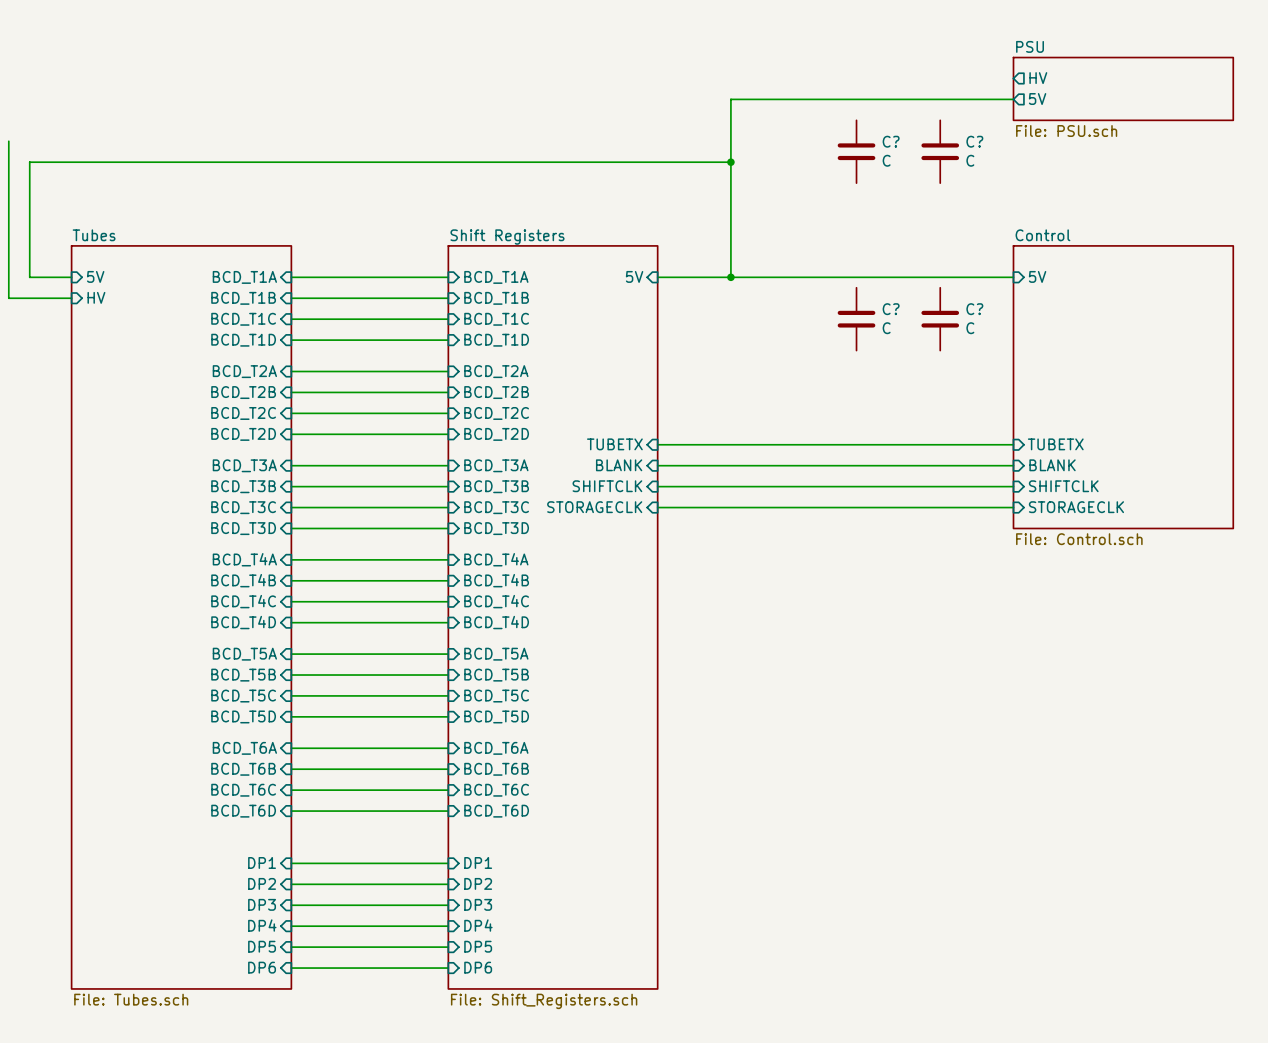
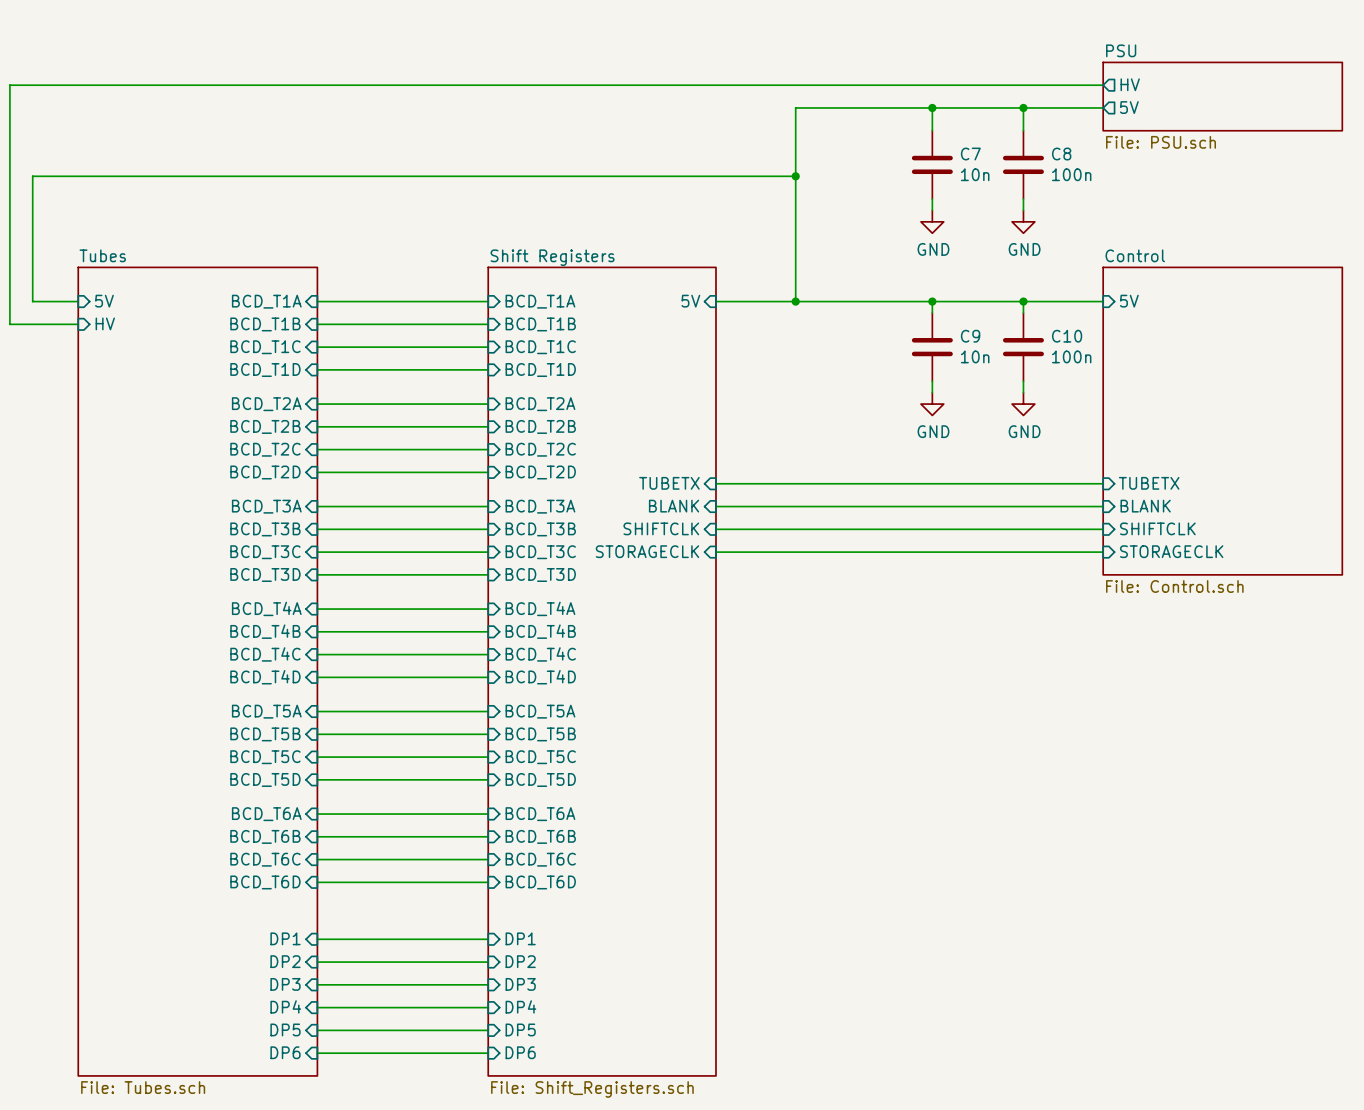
wire: none -> (1103, 85) (9, 85) (9, 153)
wire: none -> (932, 107) (932, 130)
junction: none -> (932, 107)
wire: none -> (1023, 107) (1023, 130)
junction: none -> (1023, 107)
C? name: C? (891, 141) -> C7 (970, 154)
C? name: C? (974, 141) -> C8 (1061, 154)
C? value: C (886, 160) -> 10n (975, 174)
C? value: C (970, 160) -> 100n (1071, 174)
wire: none -> (932, 199) (932, 210)
wire: none -> (1023, 199) (1023, 210)
power symbol: none -> GND (932, 221)
power symbol: none -> GND (1023, 221)
wire: none -> (932, 301) (932, 312)
junction: none -> (932, 301)
wire: none -> (1023, 301) (1023, 312)
junction: none -> (1023, 301)
C? name: C? (891, 309) -> C9 (970, 336)
C? name: C? (974, 309) -> C10 (1067, 336)
C? value: C (886, 328) -> 10n (975, 356)
C? value: C (970, 328) -> 100n (1071, 356)
wire: none -> (932, 381) (932, 392)
wire: none -> (1023, 381) (1023, 392)
power symbol: none -> GND (932, 404)
power symbol: none -> GND (1023, 404)

